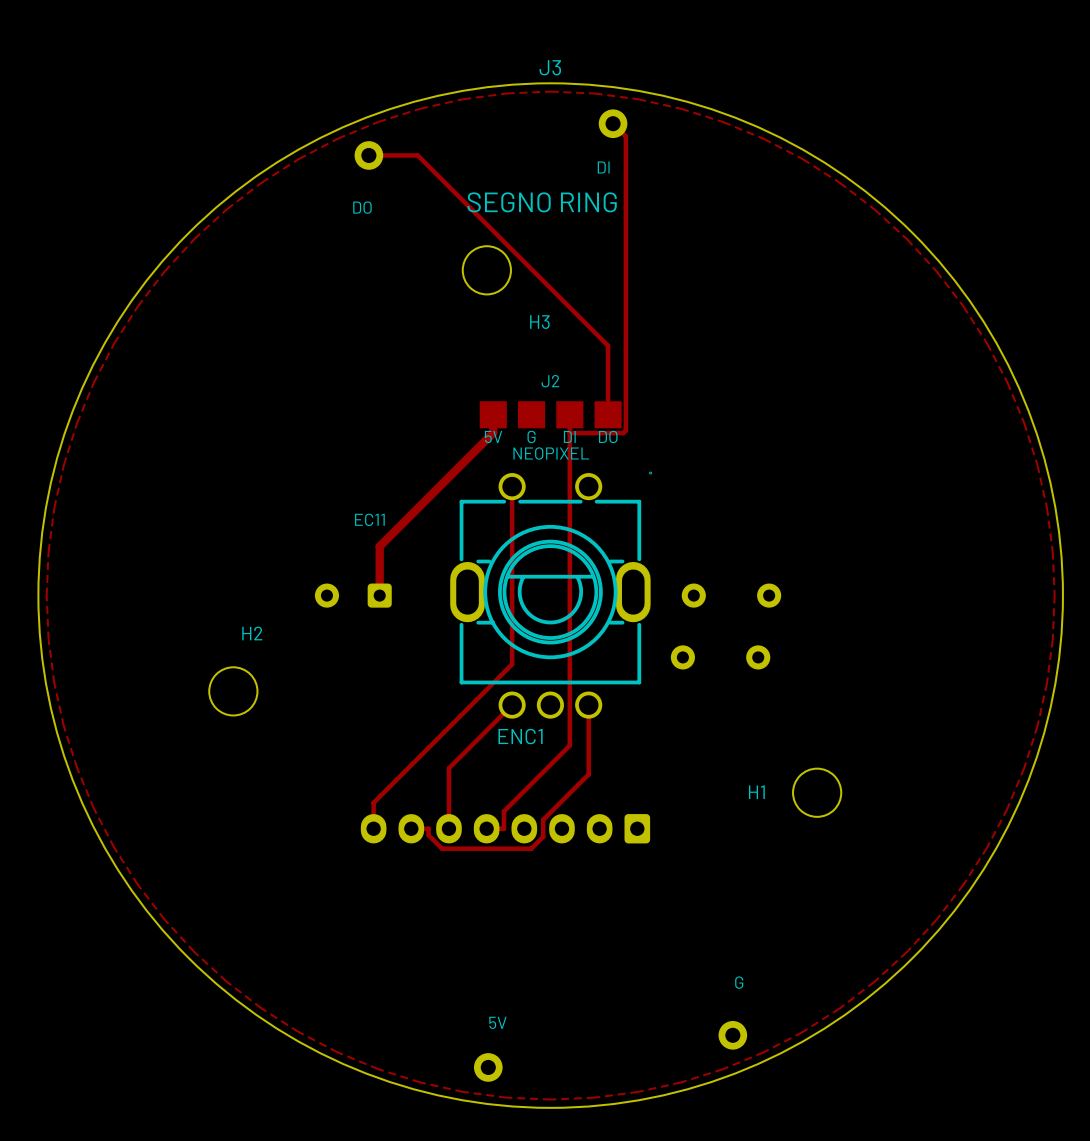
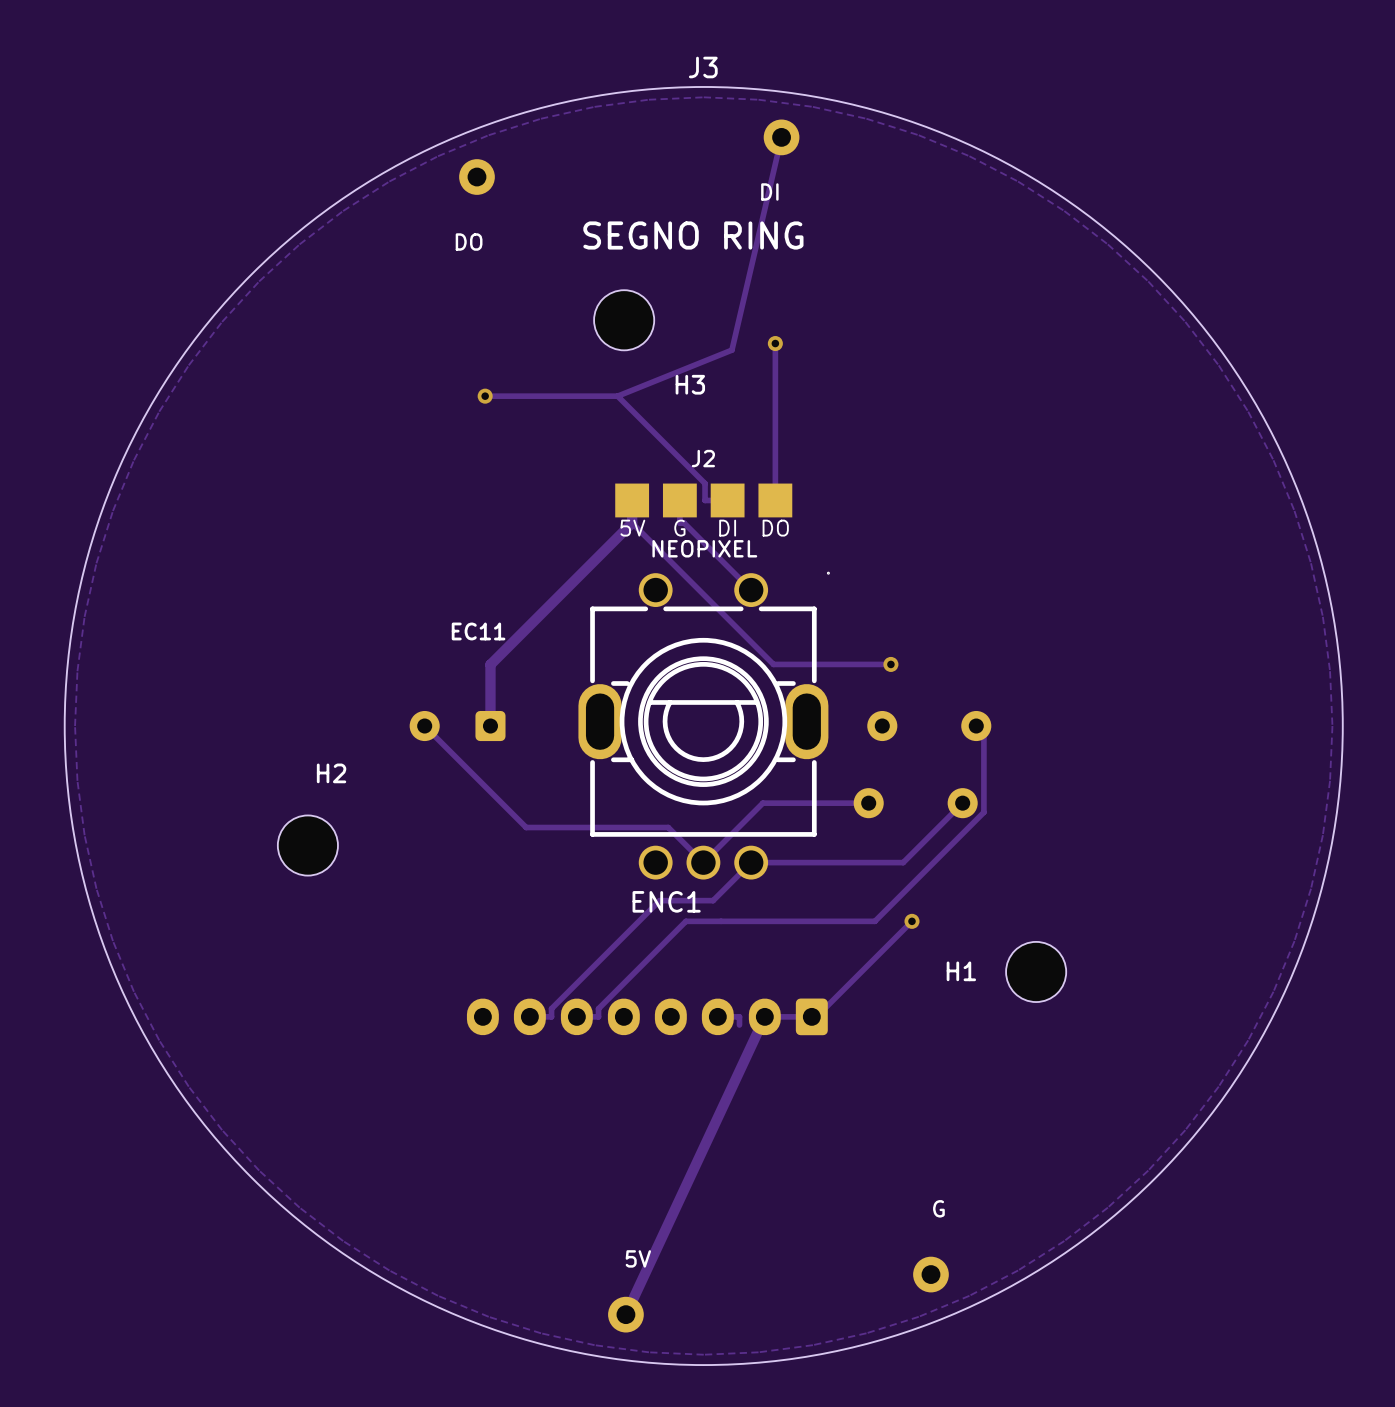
track: (613, 123) (625, 136) (625, 430) (623, 433) (569, 433) -> (781, 137) (731, 350) (617, 396)
track: (368, 155) (417, 155) (608, 345) -> (775, 343) (775, 414)
via: none -> (775, 343)
track: none -> (485, 396) (617, 396)
via: none -> (485, 396)
track: none -> (679, 500) (679, 523) (684, 523) (751, 590)
track: (569, 414) (569, 745) (503, 811) (503, 828) (486, 828) -> (727, 500) (705, 500) (705, 483) (617, 396)
track: none -> (632, 523) (773, 664) (890, 664)
track: (512, 486) (512, 664) (373, 802) (373, 828) -> none
via: none -> (890, 664)
track: none -> (424, 726) (526, 827) (668, 827) (703, 862) (762, 803) (868, 803)
track: (512, 705) (448, 768) (448, 828) -> (976, 726) (983, 733) (983, 812) (874, 921) (685, 921) (598, 1008) (598, 1016) (576, 1016)
track: (588, 705) (588, 774) (543, 819) (543, 836) (531, 848) (442, 848) (428, 835) (428, 828) -> (962, 803) (903, 862) (751, 862) (713, 900) (659, 900) (551, 1008) (551, 1016)
track: none -> (912, 921) (816, 1016) (764, 1016) (625, 1314)
via: none -> (912, 921)
track: none -> (717, 1016) (739, 1016) (739, 1024)

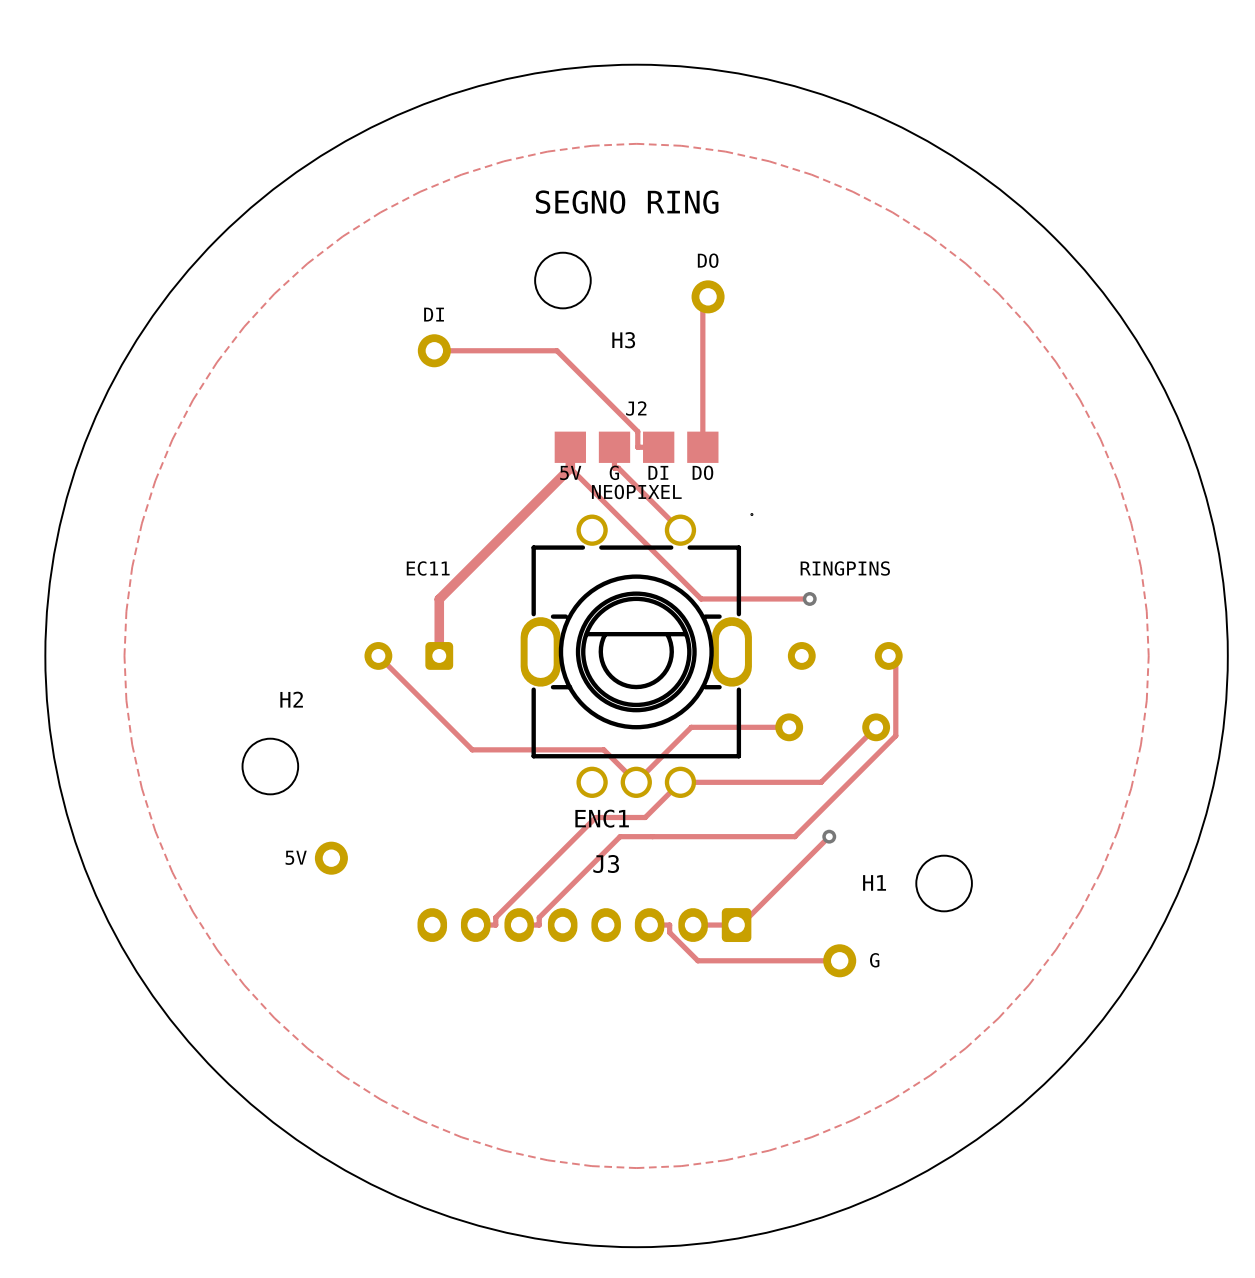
J3 name position: J3 (703, 67) -> J3 (606, 863)
zone outline: (703, 97) (648, 99) (594, 106) (541, 118) (488, 135) (438, 156) (389, 181) (343, 211) (299, 244) (259, 281) (222, 321) (188, 365) (159, 411) (133, 460) (112, 510) (96, 563) (84, 616) (77, 671) (75, 726) (77, 780) (84, 835) (96, 888) (112, 941) (133, 991) (159, 1040) (188, 1086) (222, 1130) (259, 1170) (299, 1207) (343, 1241) (389, 1270) (438, 1295) (488, 1316) (541, 1333) (594, 1345) (648, 1352) (703, 1354) (758, 1352) (812, 1345) (866, 1333) (918, 1316) (969, 1295) (1018, 1270) (1064, 1241) (1107, 1207) (1148, 1170) (1185, 1130) (1218, 1086) (1248, 1040) (1273, 991) (1294, 941) (1311, 888) (1322, 835) (1330, 780) (1332, 726) (1330, 671) (1322, 616) (1311, 563) (1294, 510) (1273, 460) (1248, 411) (1218, 365) (1185, 321) (1148, 281) (1107, 244) (1064, 211) (1018, 181) (969, 156) (918, 135) (866, 118) (812, 106) (758, 99) (703, 97) -> (636, 143) (591, 145) (547, 151) (504, 161) (461, 174) (420, 191) (380, 212) (342, 236) (307, 263) (274, 293) (244, 326) (217, 362) (193, 399) (172, 439) (155, 480) (141, 523) (132, 567) (126, 611) (124, 655) (126, 700) (132, 744) (141, 788) (155, 831) (172, 872) (193, 912) (217, 949) (244, 985) (274, 1018) (307, 1048) (342, 1075) (380, 1099) (420, 1120) (461, 1137) (504, 1150) (547, 1160) (591, 1166) (636, 1168) (681, 1166) (725, 1160) (769, 1150) (811, 1137) (853, 1120) (892, 1099) (930, 1075) (965, 1048) (998, 1018) (1028, 985) (1056, 949) (1080, 912) (1100, 872) (1117, 831) (1131, 788) (1140, 744) (1146, 700) (1148, 655) (1146, 611) (1140, 567) (1131, 523) (1117, 480) (1100, 439) (1080, 399) (1056, 362) (1028, 326) (998, 293) (965, 263) (930, 236) (892, 212) (853, 191) (811, 174) (769, 161) (725, 151) (681, 145) (636, 143)
J3 footprint: [459, 119, 949, 1333] -> [314, 280, 857, 978]
track: (781, 137) (731, 350) (617, 396) -> none
via: (775, 343) -> none
via: (485, 396) -> none
J3 value: none -> RINGPINS (845, 568)
track: (764, 1016) (625, 1314) -> none
track: none -> (669, 932) (697, 960) (839, 960)

